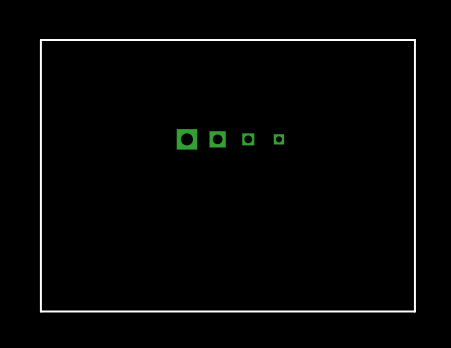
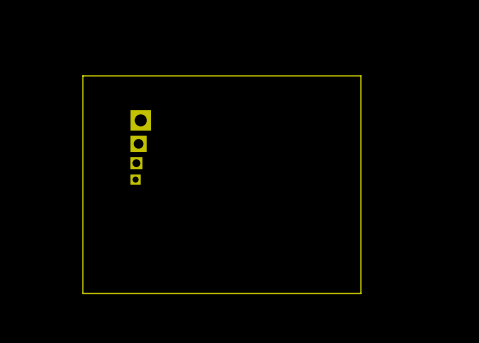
part position: (186, 139) -> (140, 120)
part position: (217, 139) -> (138, 143)
part position: (248, 139) -> (136, 163)
part position: (278, 139) -> (135, 179)
board edge: (342, 311) (414, 311) (414, 40) (40, 40) (40, 311) (65, 311) -> (360, 293) (360, 75) (82, 75) (82, 293)

